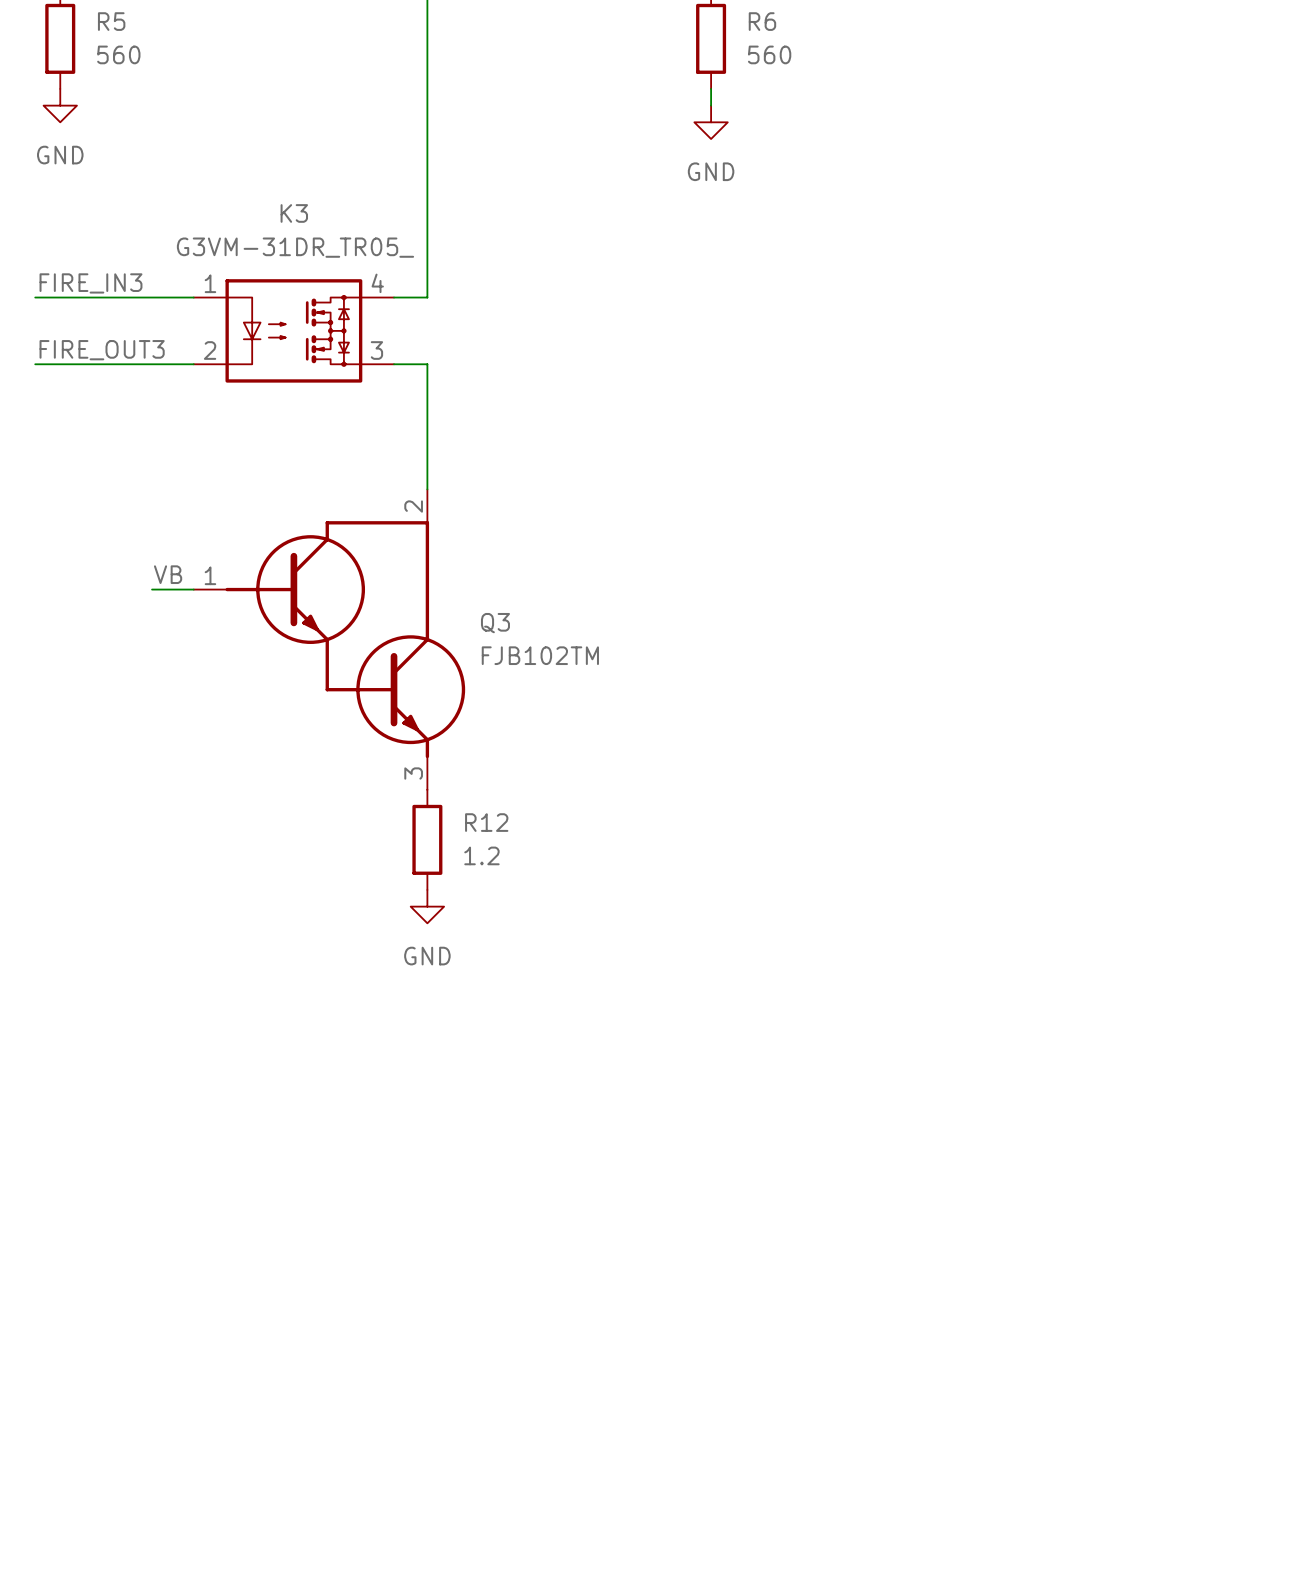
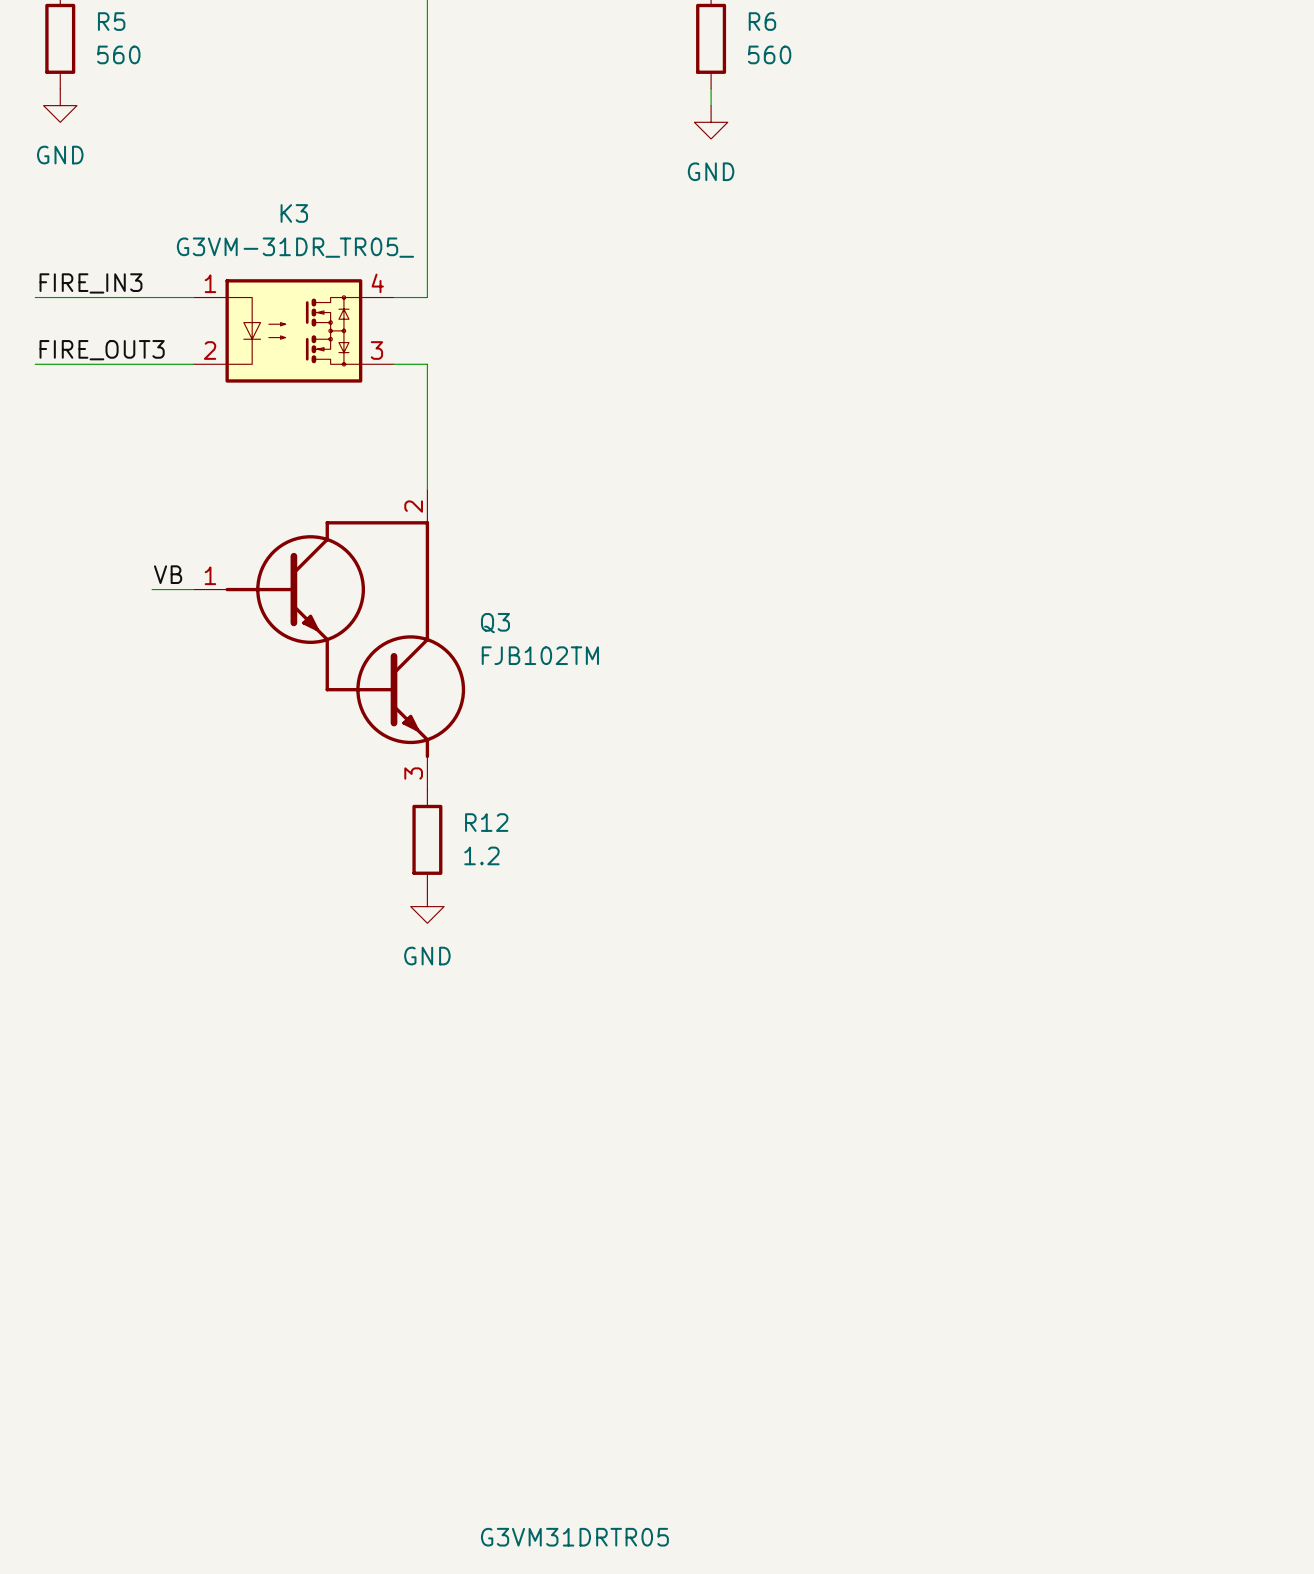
K3 text: none -> G3VM31DRTR05 (574, 1537)

